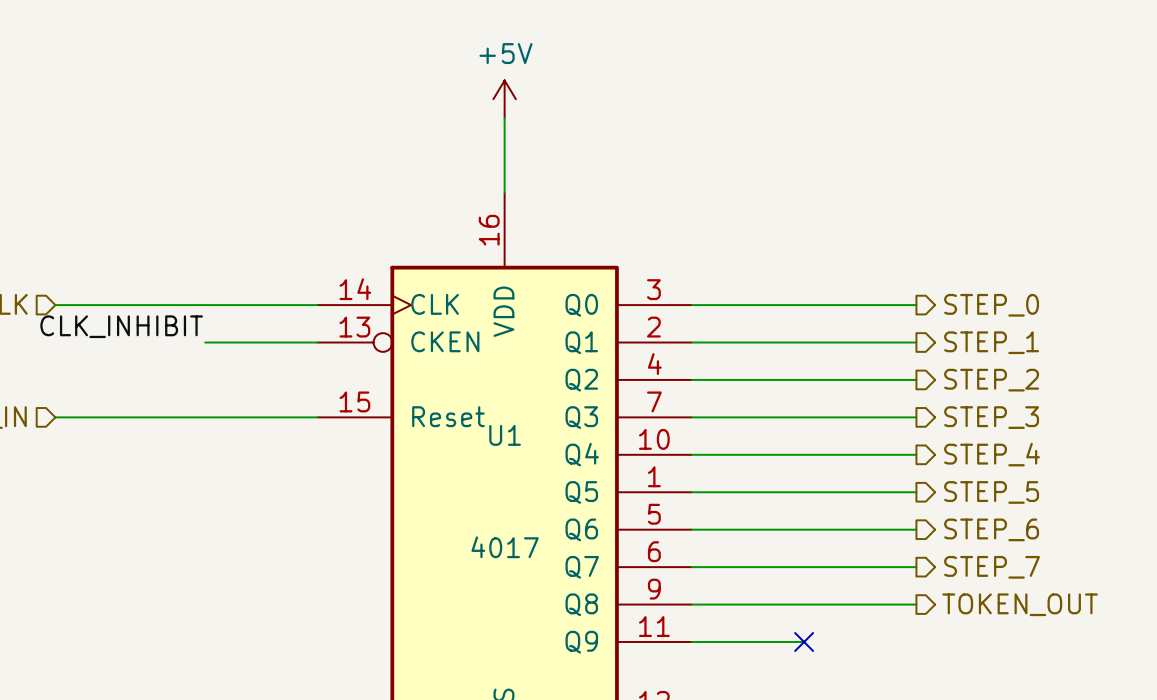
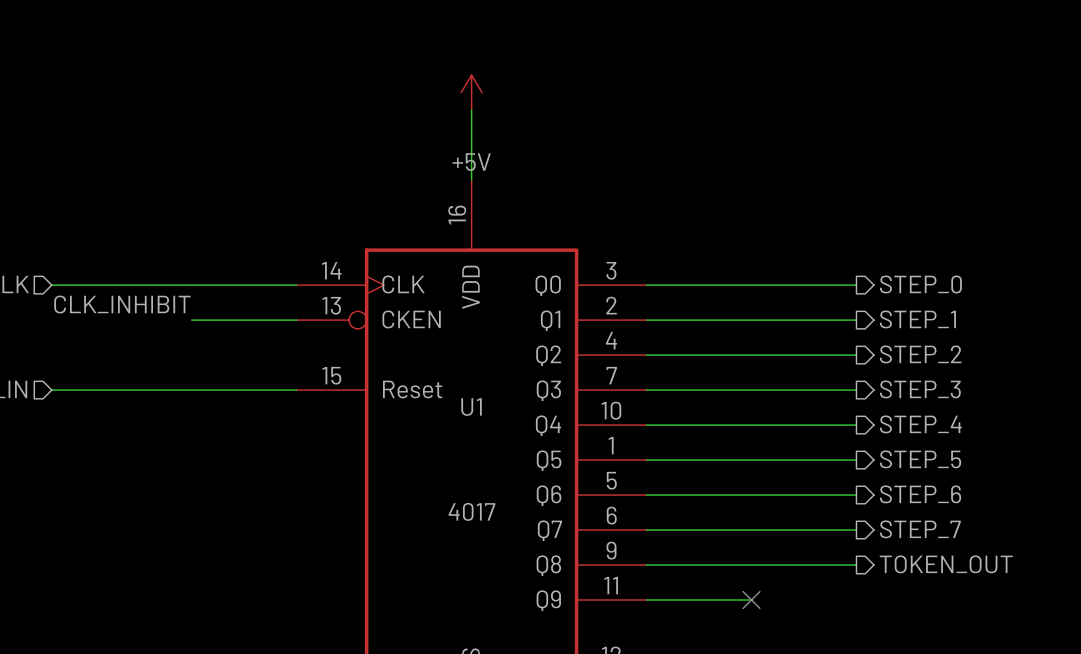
power symbol text position: +5V (505, 53) -> +5V (471, 162)

